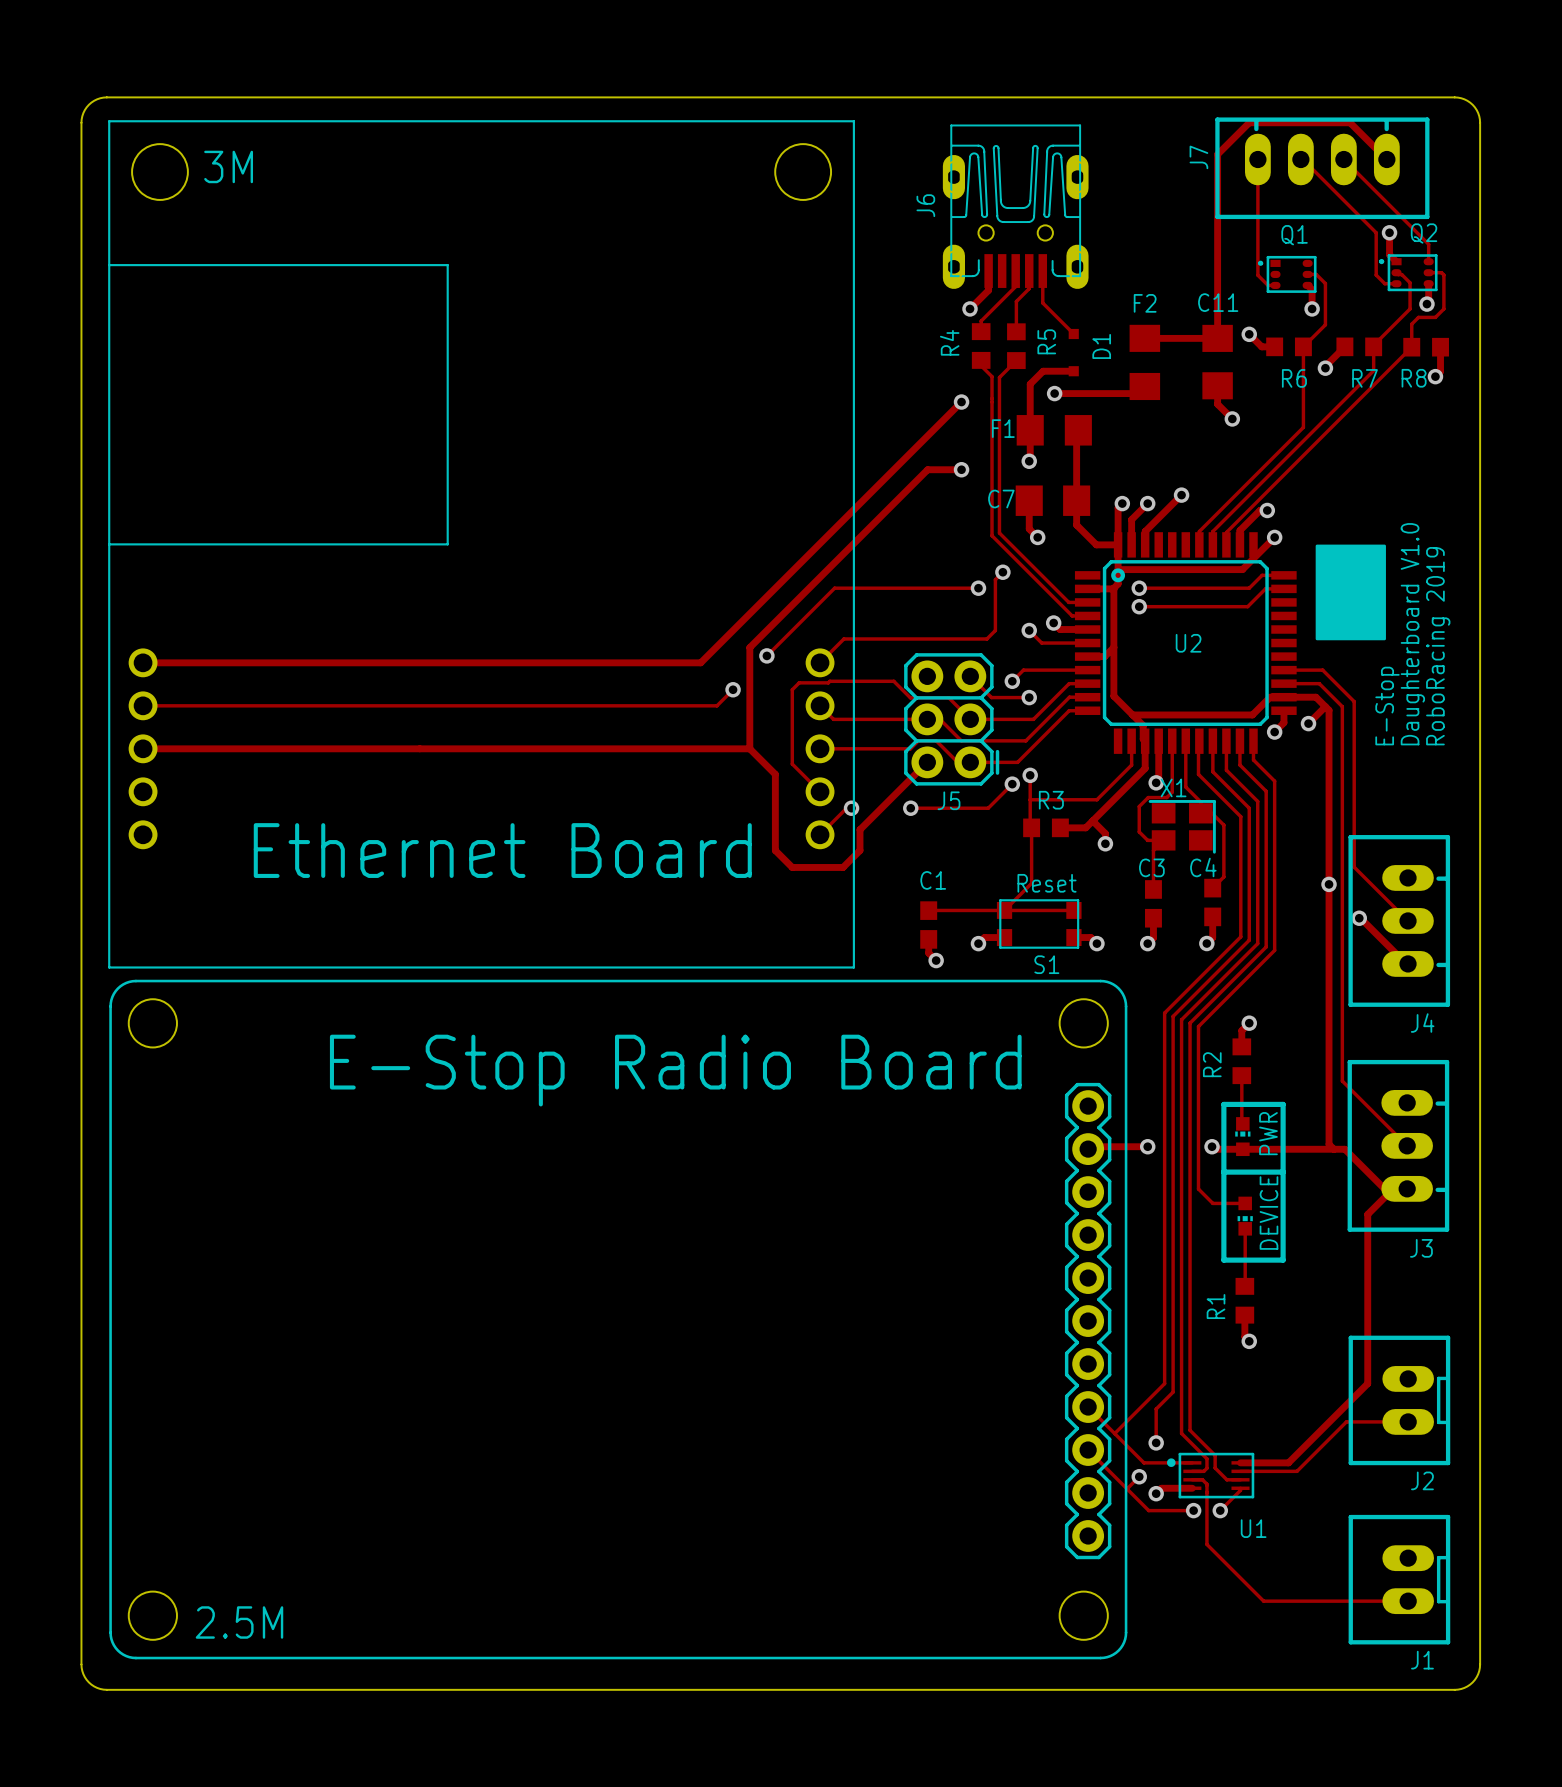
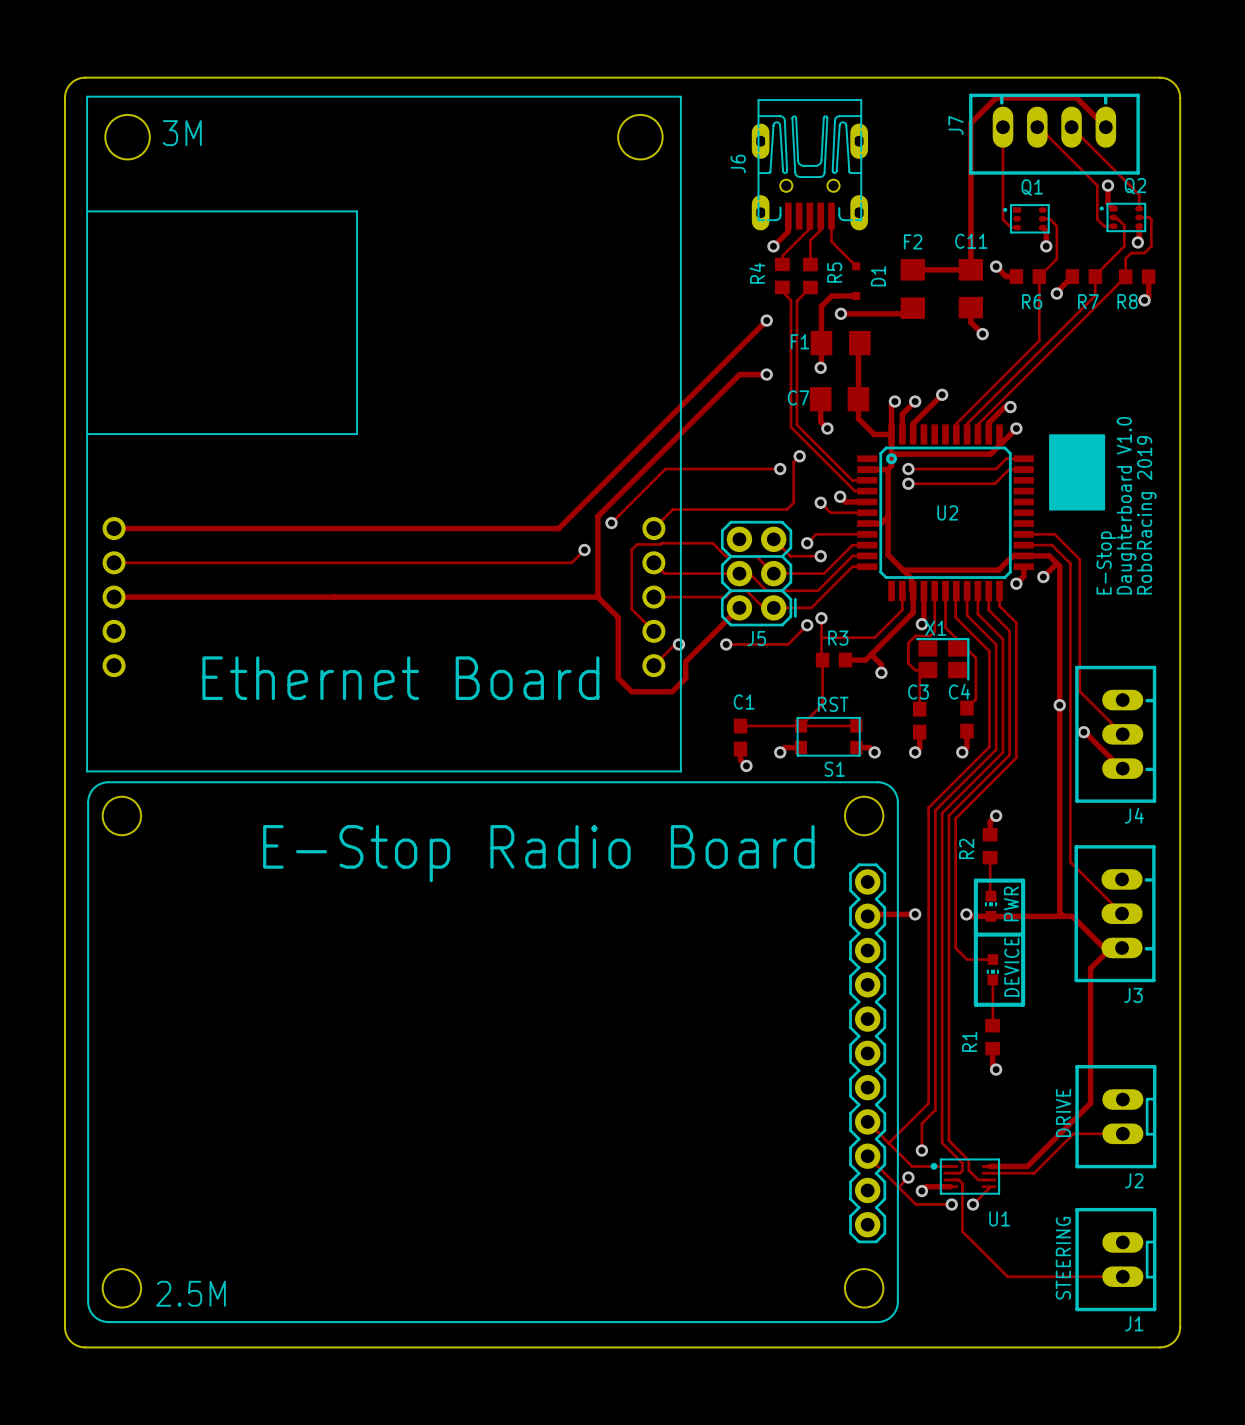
S1 text: Reset (1047, 883) -> RST (833, 704)
J2 value: none -> DRIVE (1063, 1113)
J1 value: none -> STEERING (1063, 1258)

